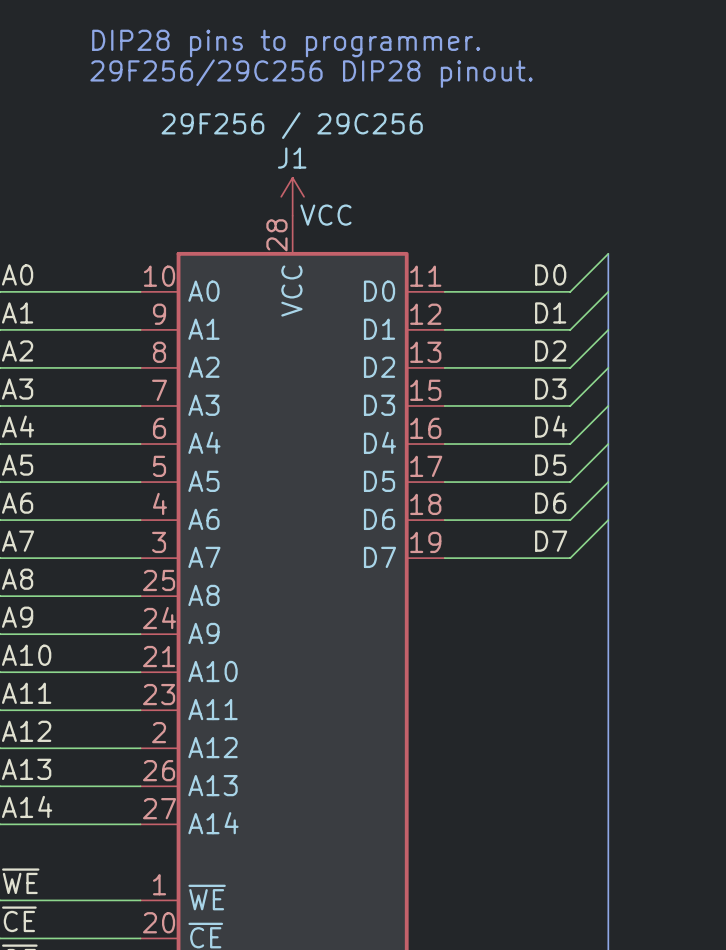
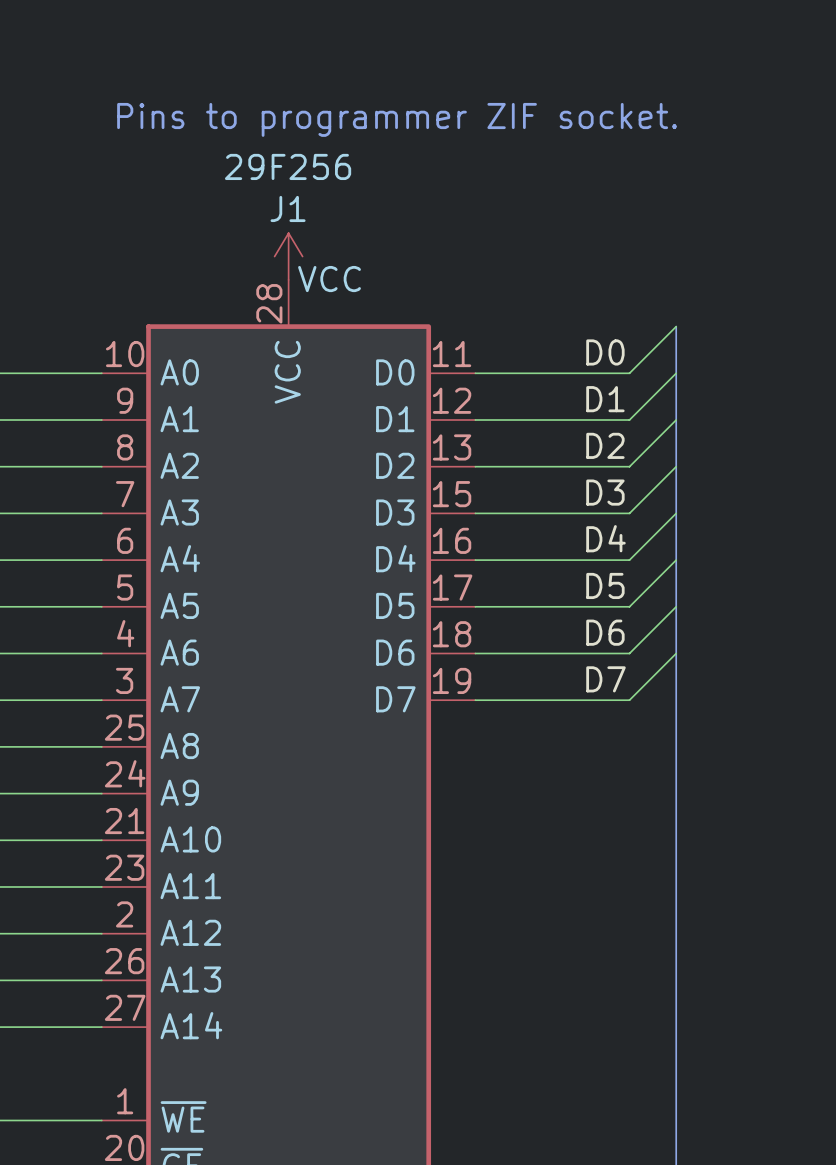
text: DIP28 pins to programmer. (286, 43) -> none
text: 29F256/29C256 DIP28 pinout. (311, 73) -> none
text: none -> Pins to programmer ZIF socket. (397, 119)
J1 value: 29F256 / 29C256 (292, 125) -> 29F256 (288, 166)

